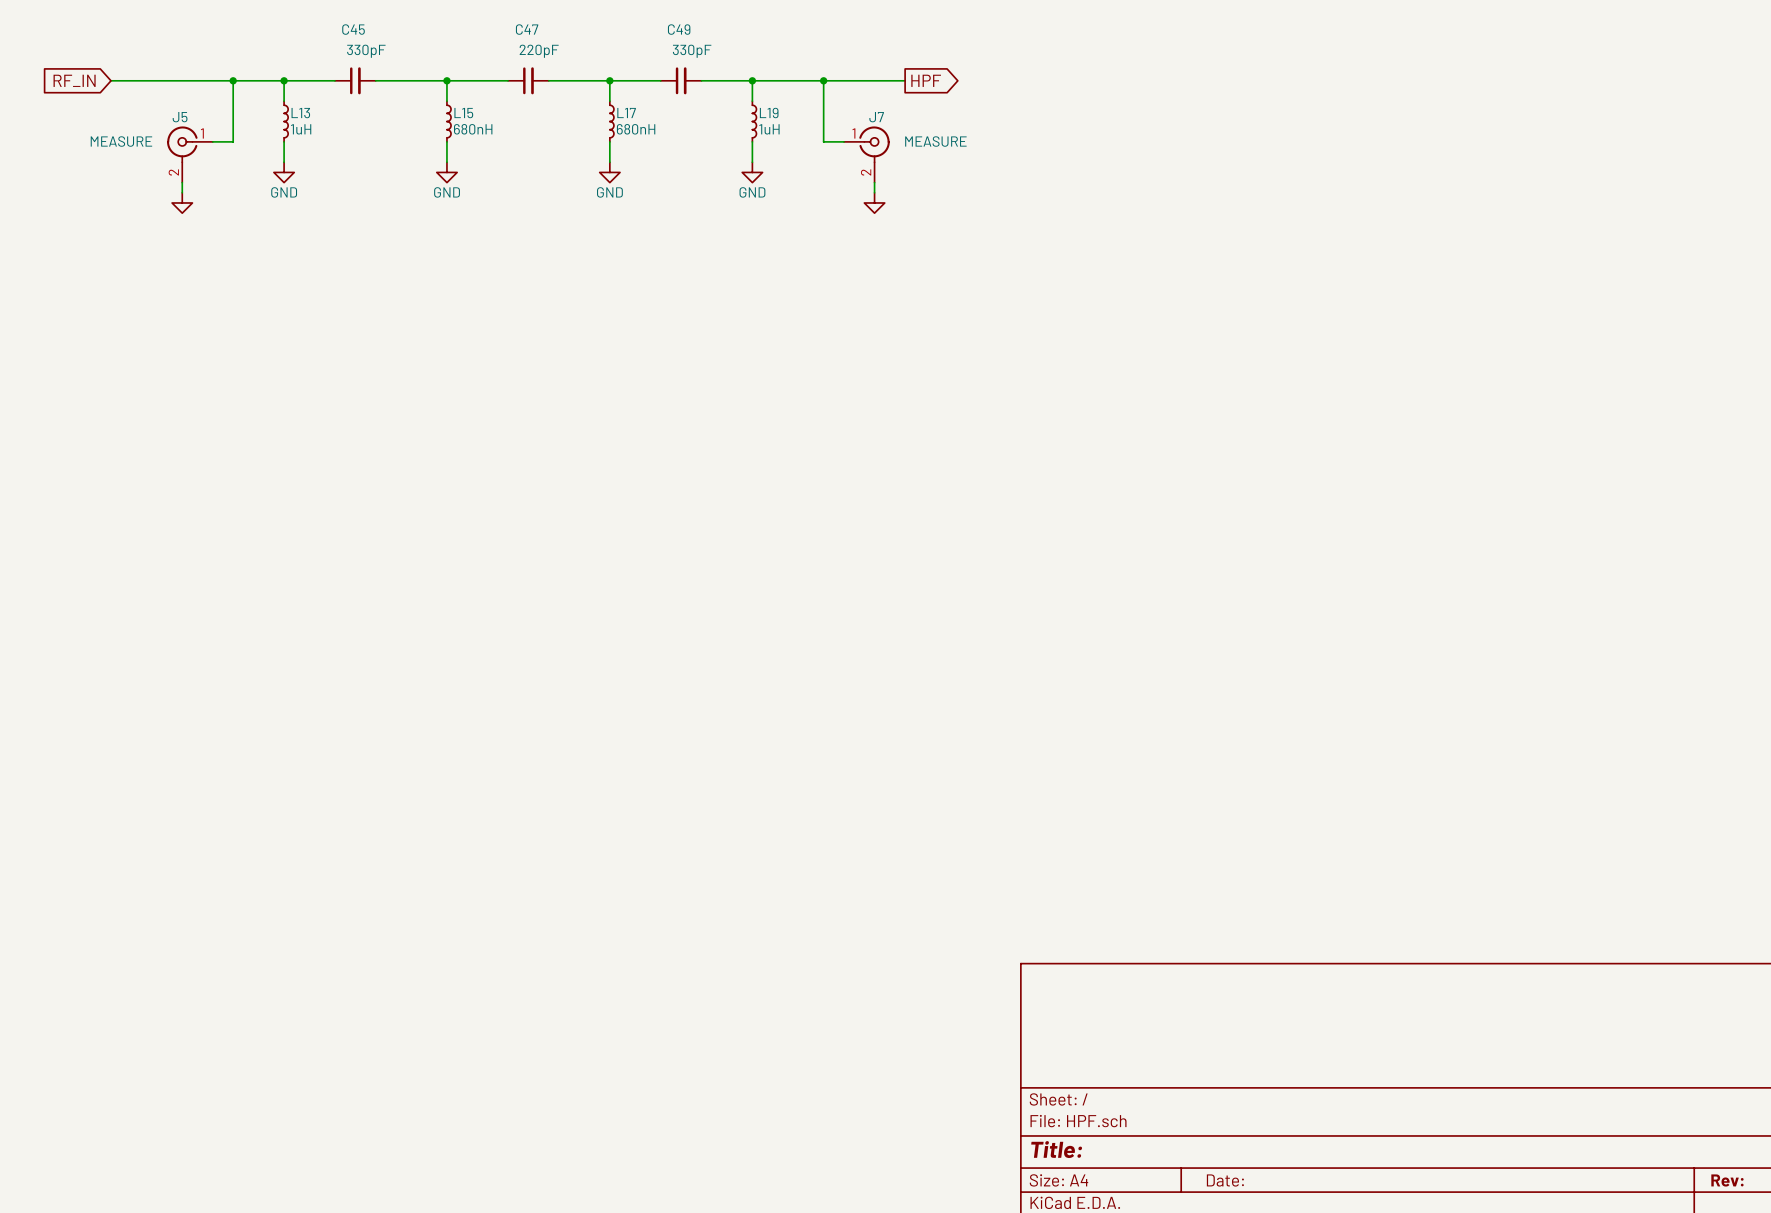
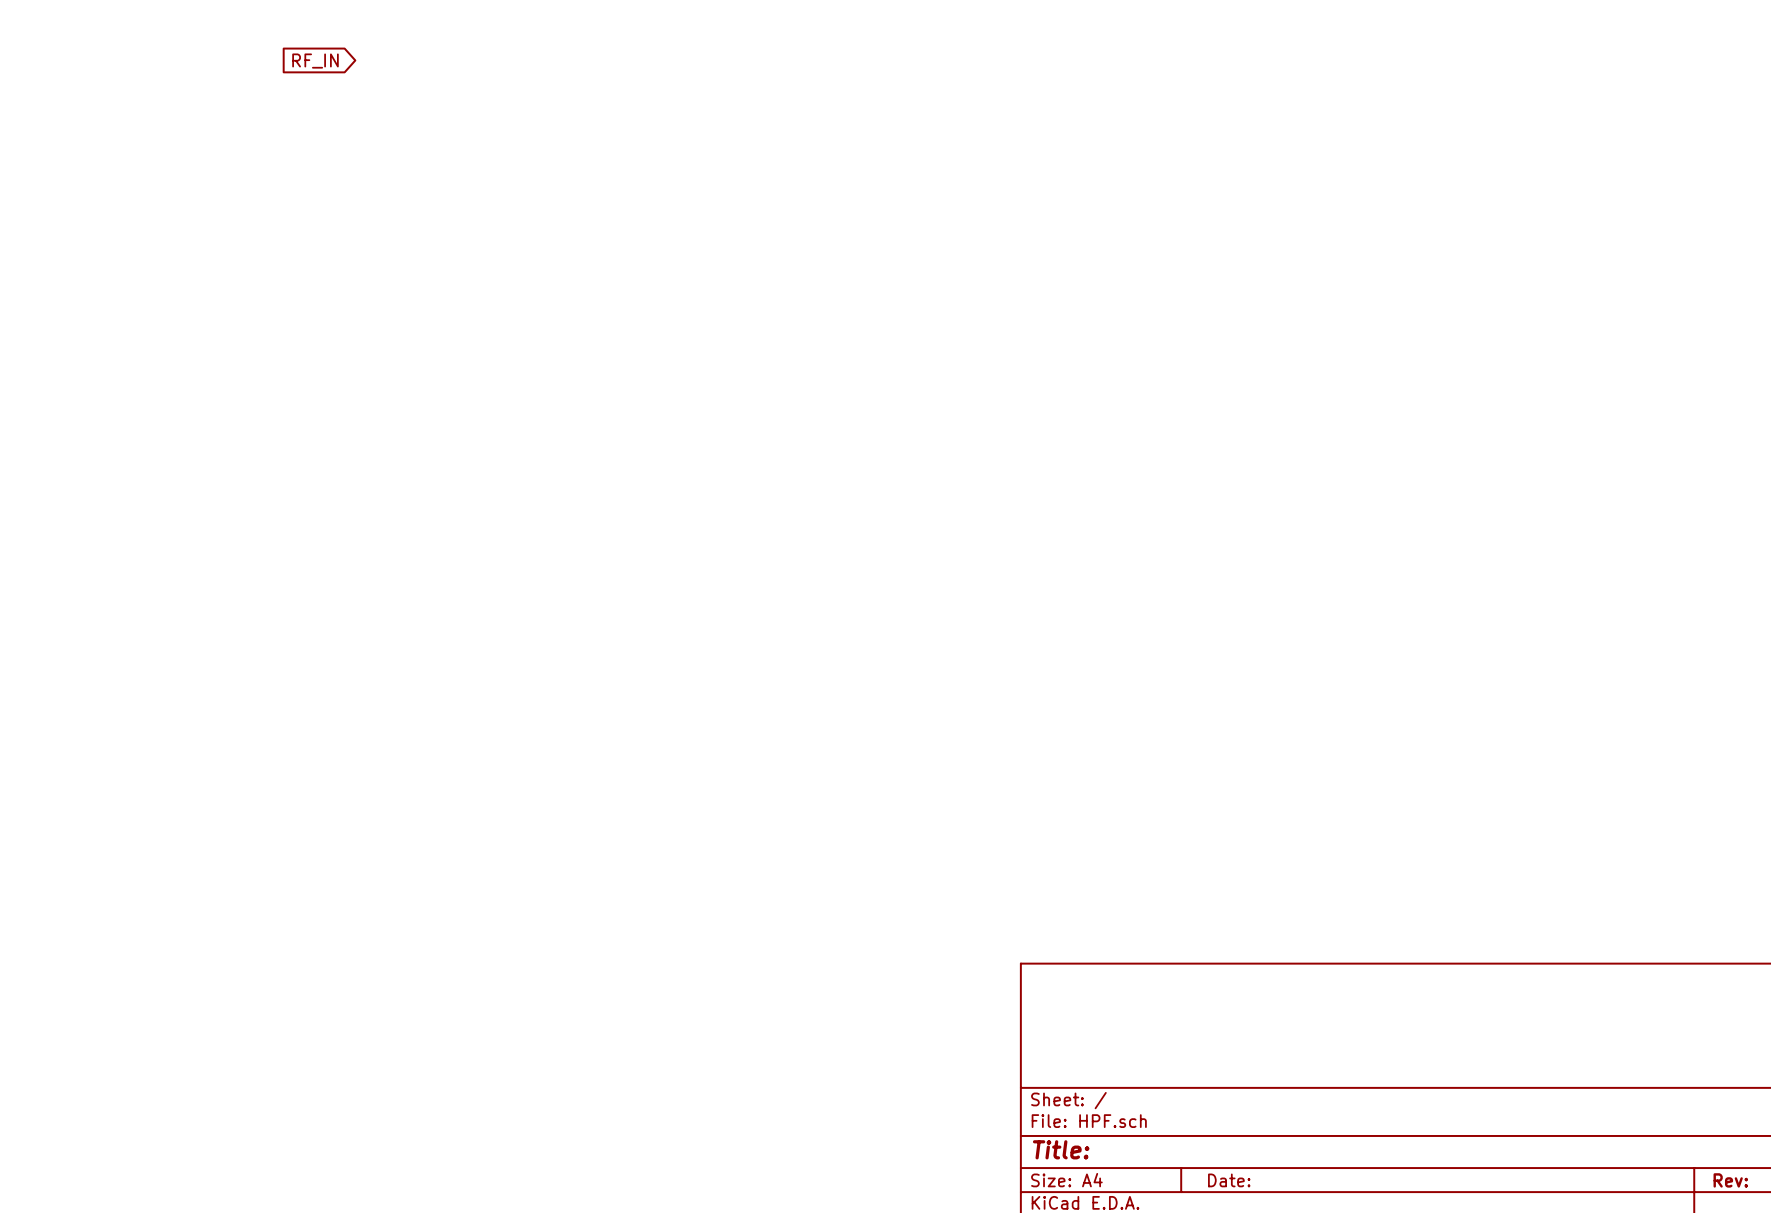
global label: none -> RF_IN (315, 61)
global label: RF_IN (74, 80) -> none
wire: (111, 80) (334, 80) -> none
wire: (233, 80) (233, 141) (212, 141) -> none
junction: (233, 80) -> none
wire: (284, 80) (284, 101) -> none
junction: (284, 80) -> none
C45: 330pF (355, 80) -> none
wire: (375, 80) (508, 80) -> none
wire: (446, 80) (446, 101) -> none
junction: (446, 80) -> none
C47: 220pF (528, 80) -> none
wire: (548, 80) (660, 80) -> none
wire: (609, 80) (609, 101) -> none
junction: (609, 80) -> none
C49: 330pF (681, 80) -> none
wire: (701, 80) (905, 80) -> none
wire: (752, 80) (752, 101) -> none
junction: (752, 80) -> none
wire: (823, 80) (823, 141) (844, 141) -> none
junction: (823, 80) -> none
global label: HPF (926, 80) -> none
L13: 1uH (286, 121) -> none
L15: 680nH (449, 121) -> none
L17: 680nH (611, 121) -> none
L19: 1uH (754, 121) -> none
wire: (284, 141) (284, 162) -> none
wire: (446, 141) (446, 162) -> none
wire: (609, 141) (609, 162) -> none
wire: (752, 141) (752, 162) -> none
J5: MEASURE (189, 154) -> none
J7: MEASURE (866, 154) -> none
power symbol: GND (284, 172) -> none
power symbol: GND (446, 172) -> none
power symbol: GND (609, 172) -> none
power symbol: GND (752, 172) -> none
wire: (182, 182) (182, 192) -> none
wire: (874, 182) (874, 192) -> none
power symbol: (182, 202) -> none
power symbol: (874, 202) -> none

